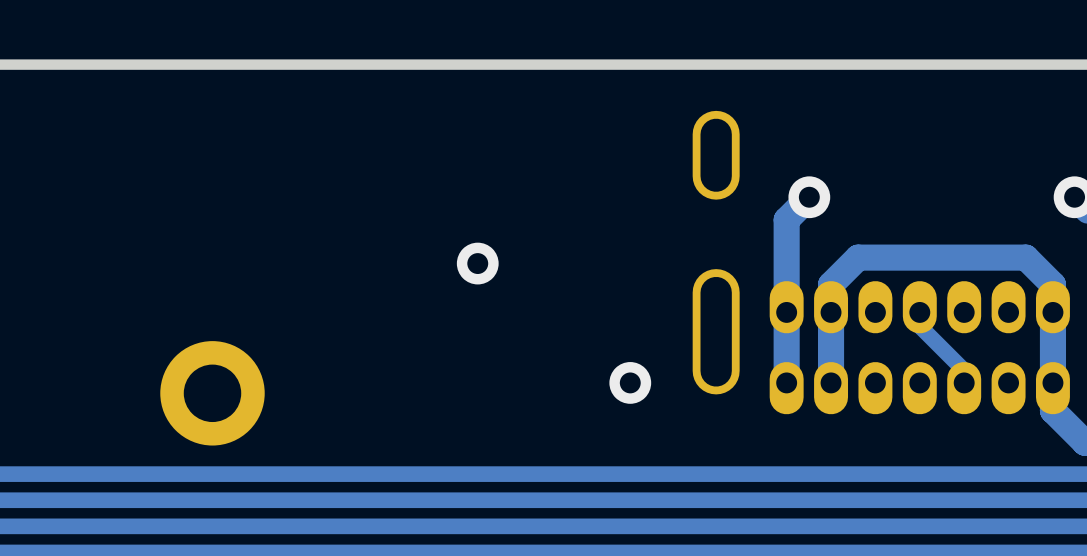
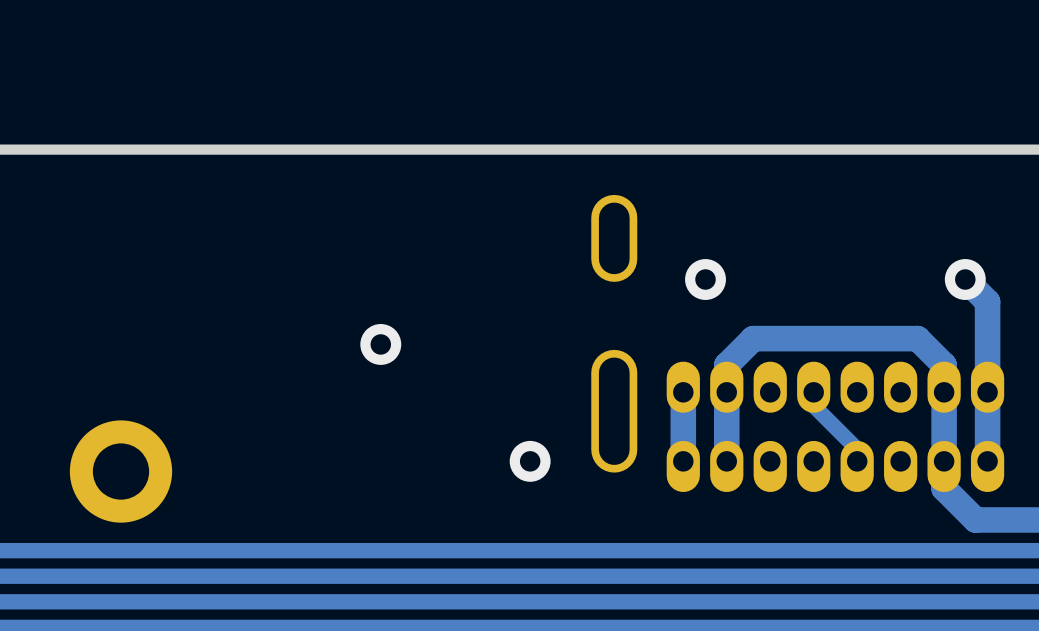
track: (809, 197) (786, 219) (786, 312) -> none

